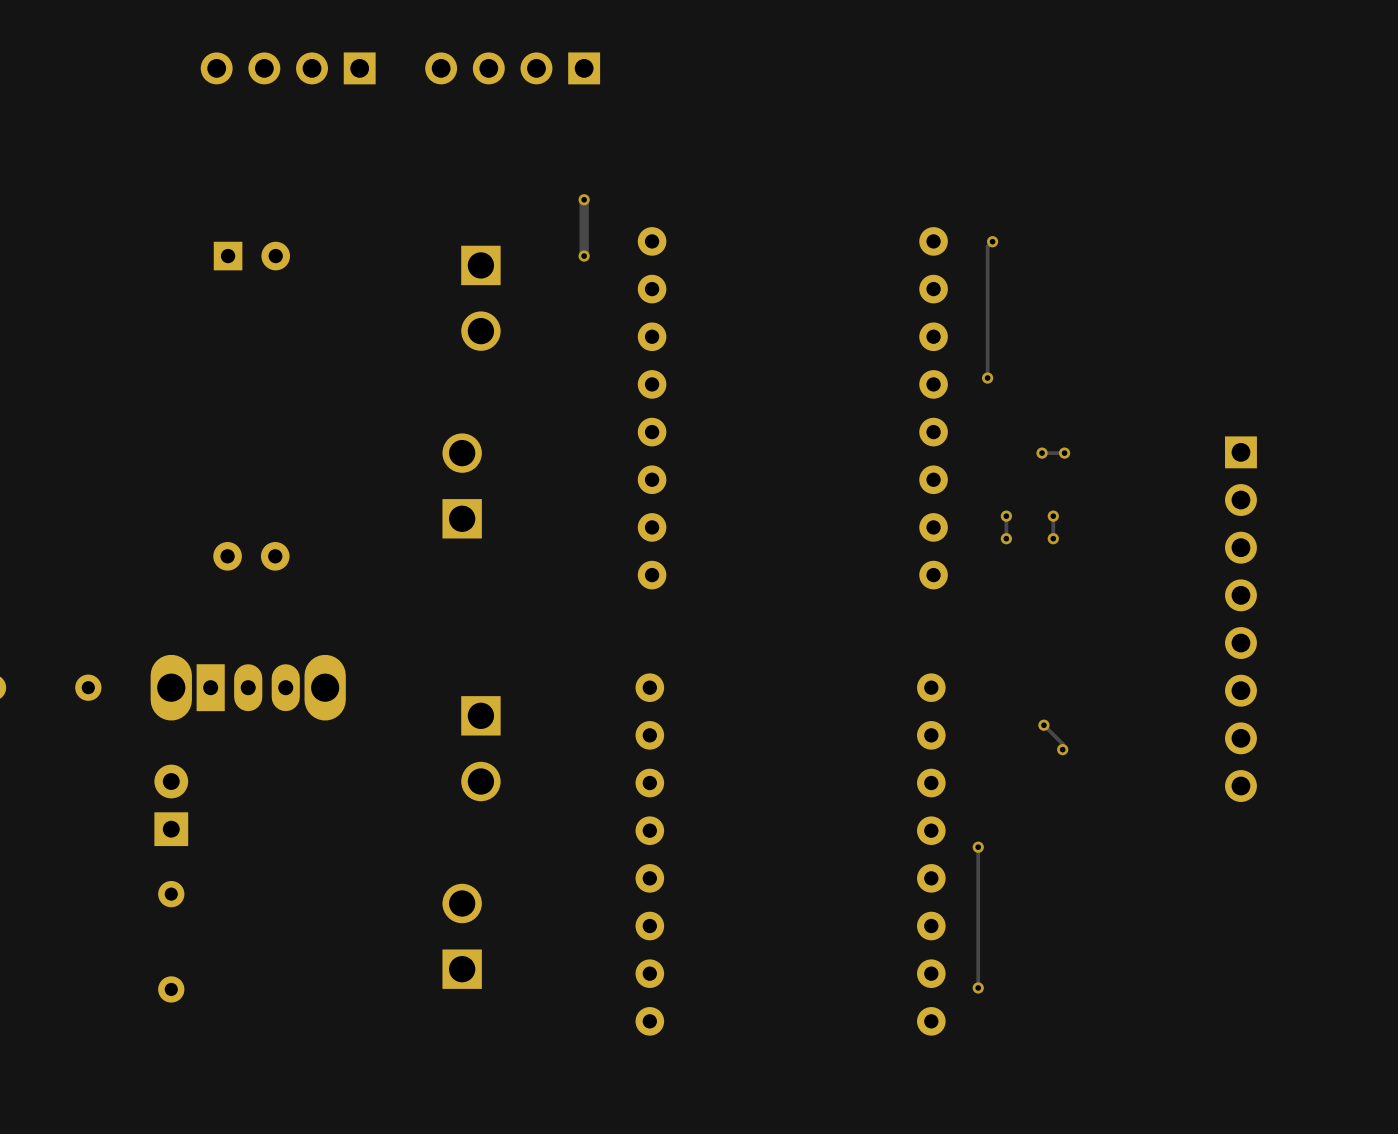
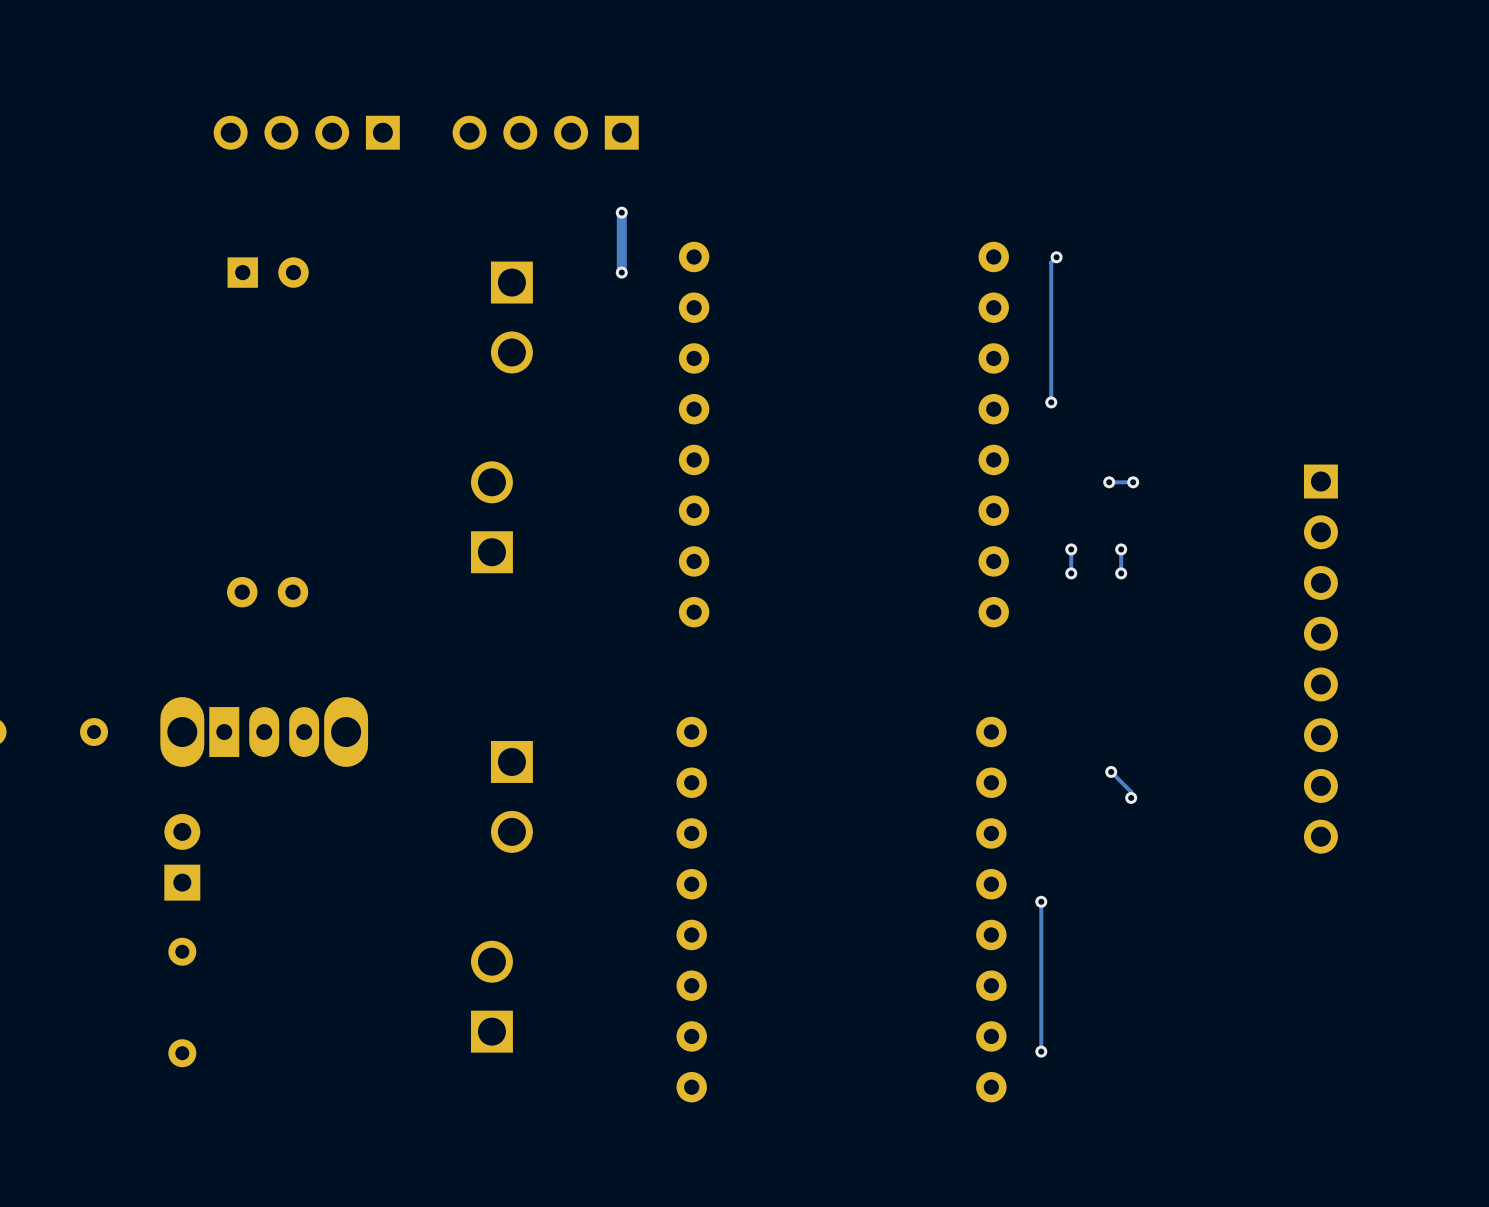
part position: (288, 68) -> (306, 132)
part position: (512, 68) -> (545, 132)

